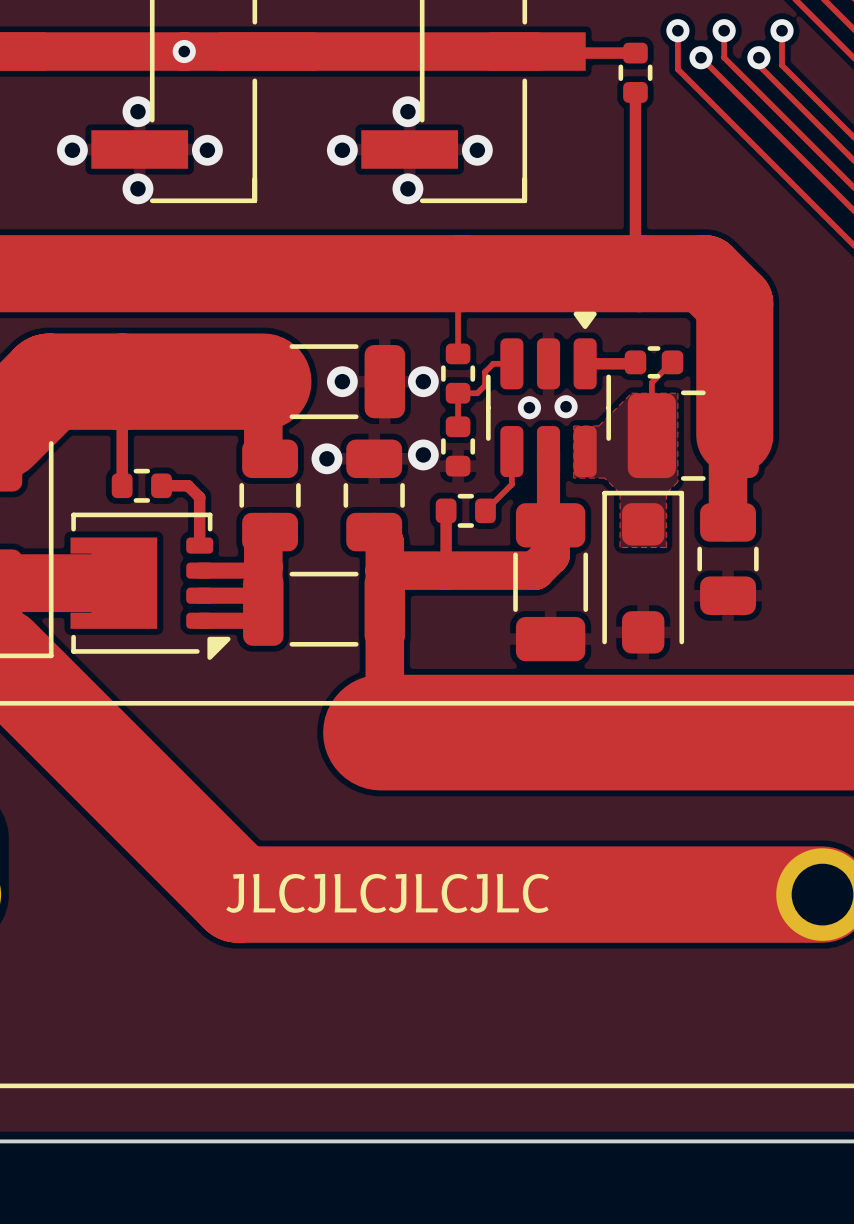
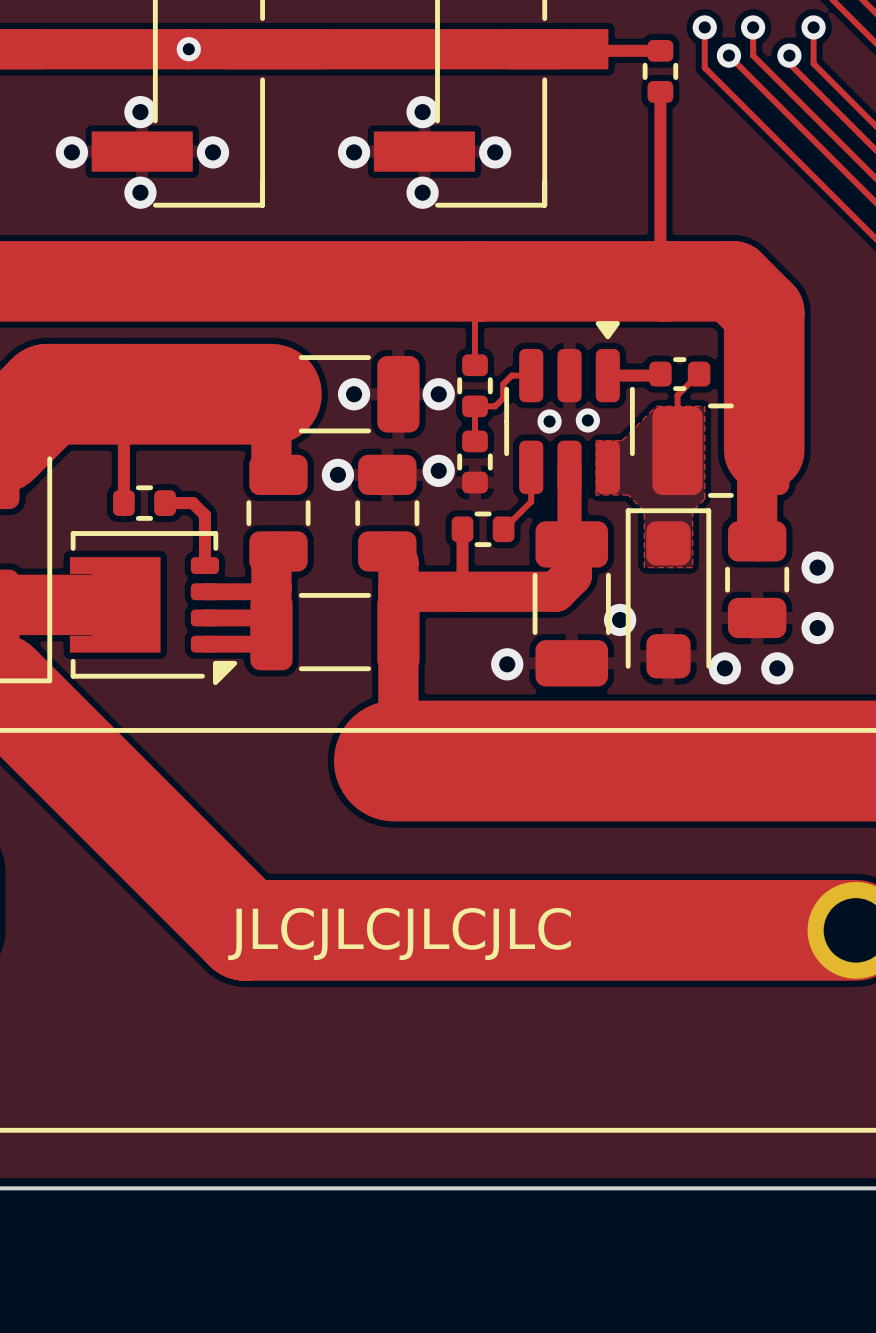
via: none -> (817, 567)
via: none -> (620, 619)
via: none -> (817, 628)
via: none -> (507, 664)
via: none -> (724, 668)
via: none -> (777, 668)

